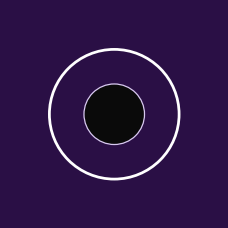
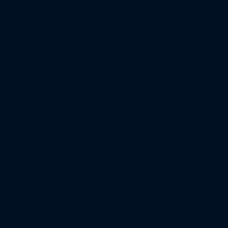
part: (114, 114) -> none

